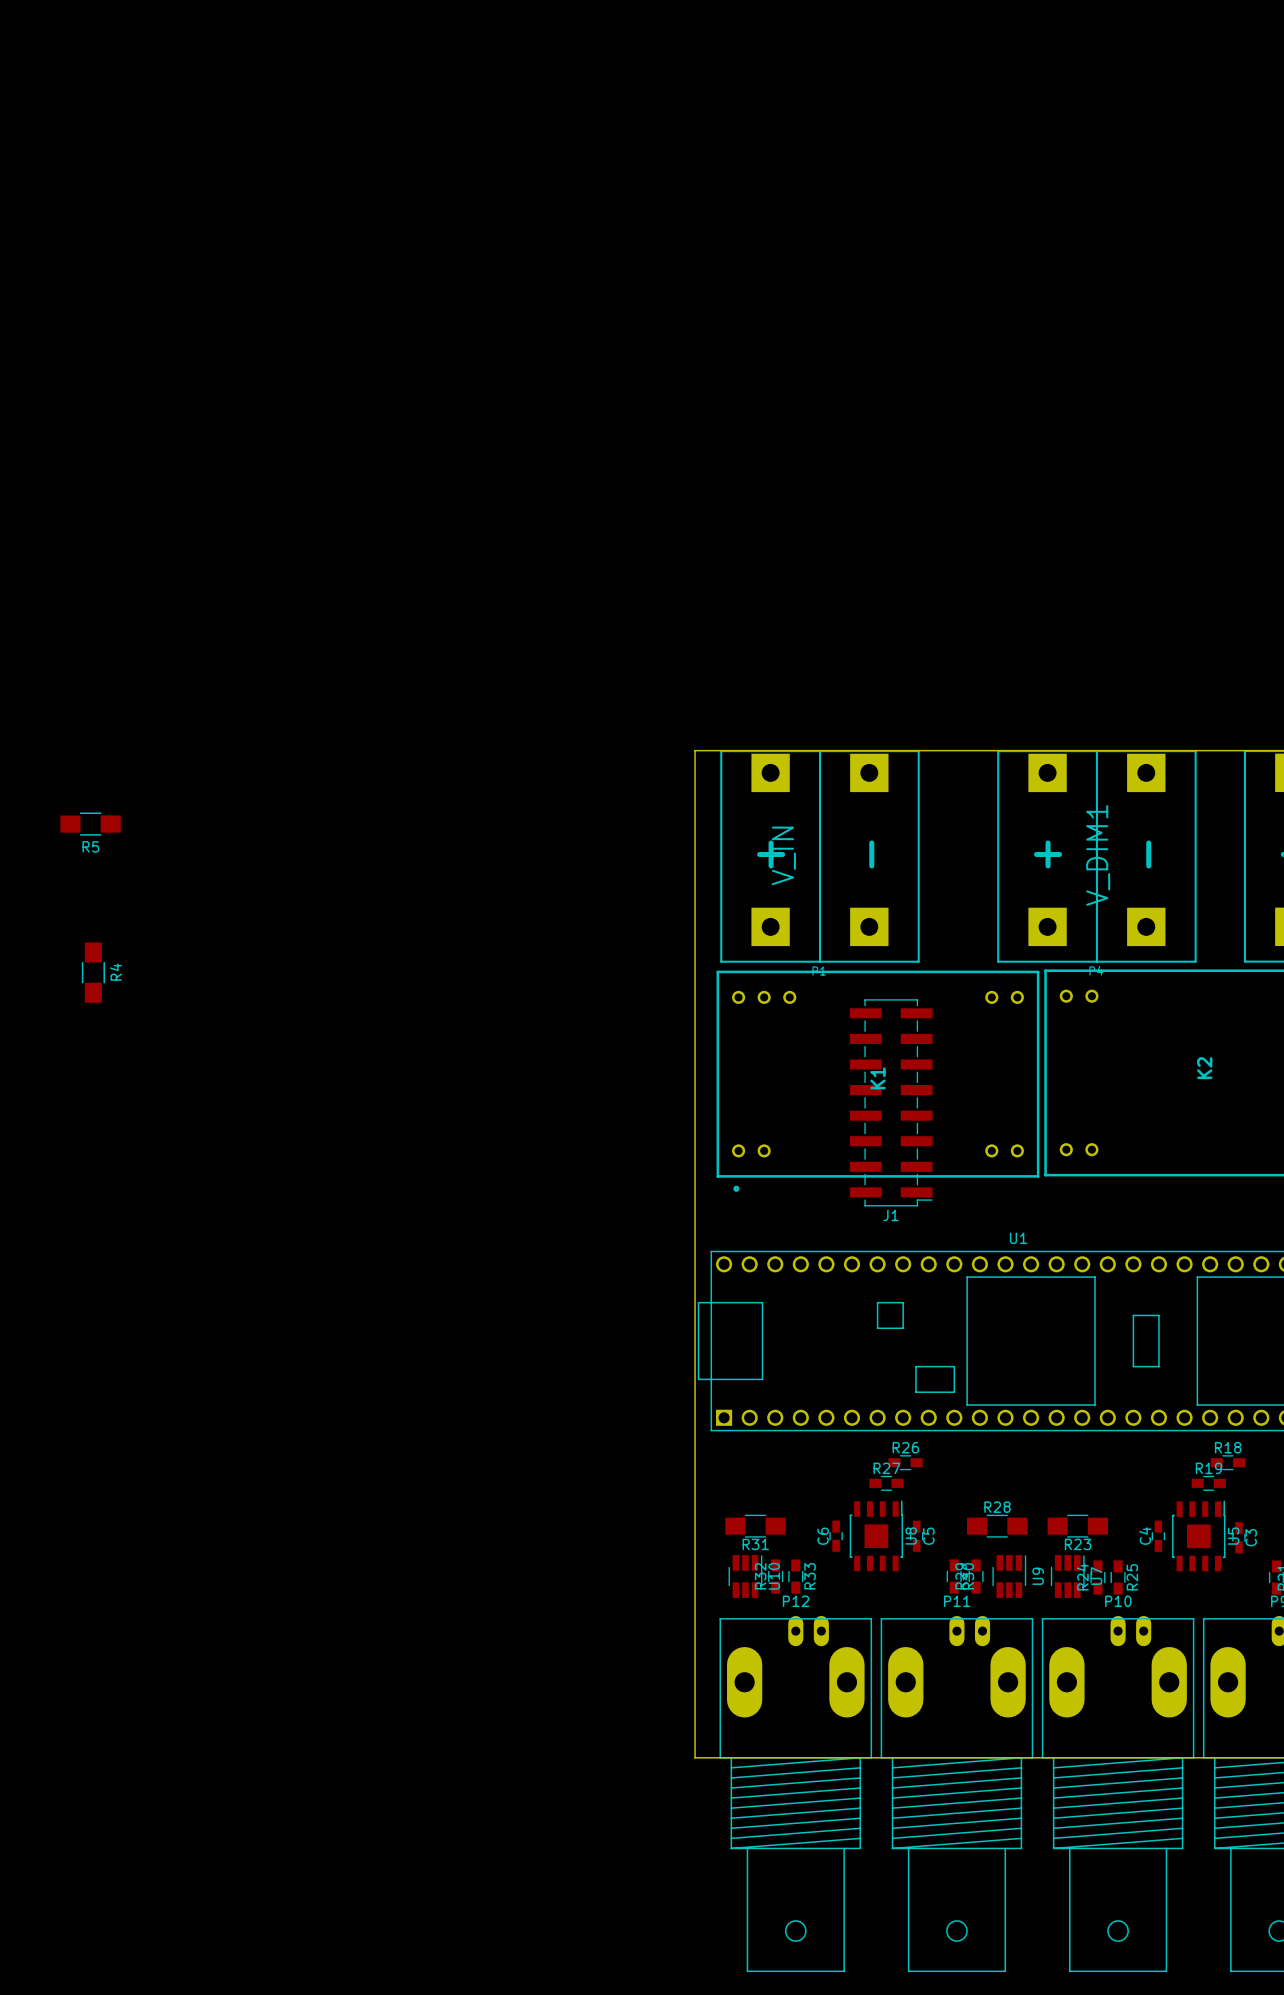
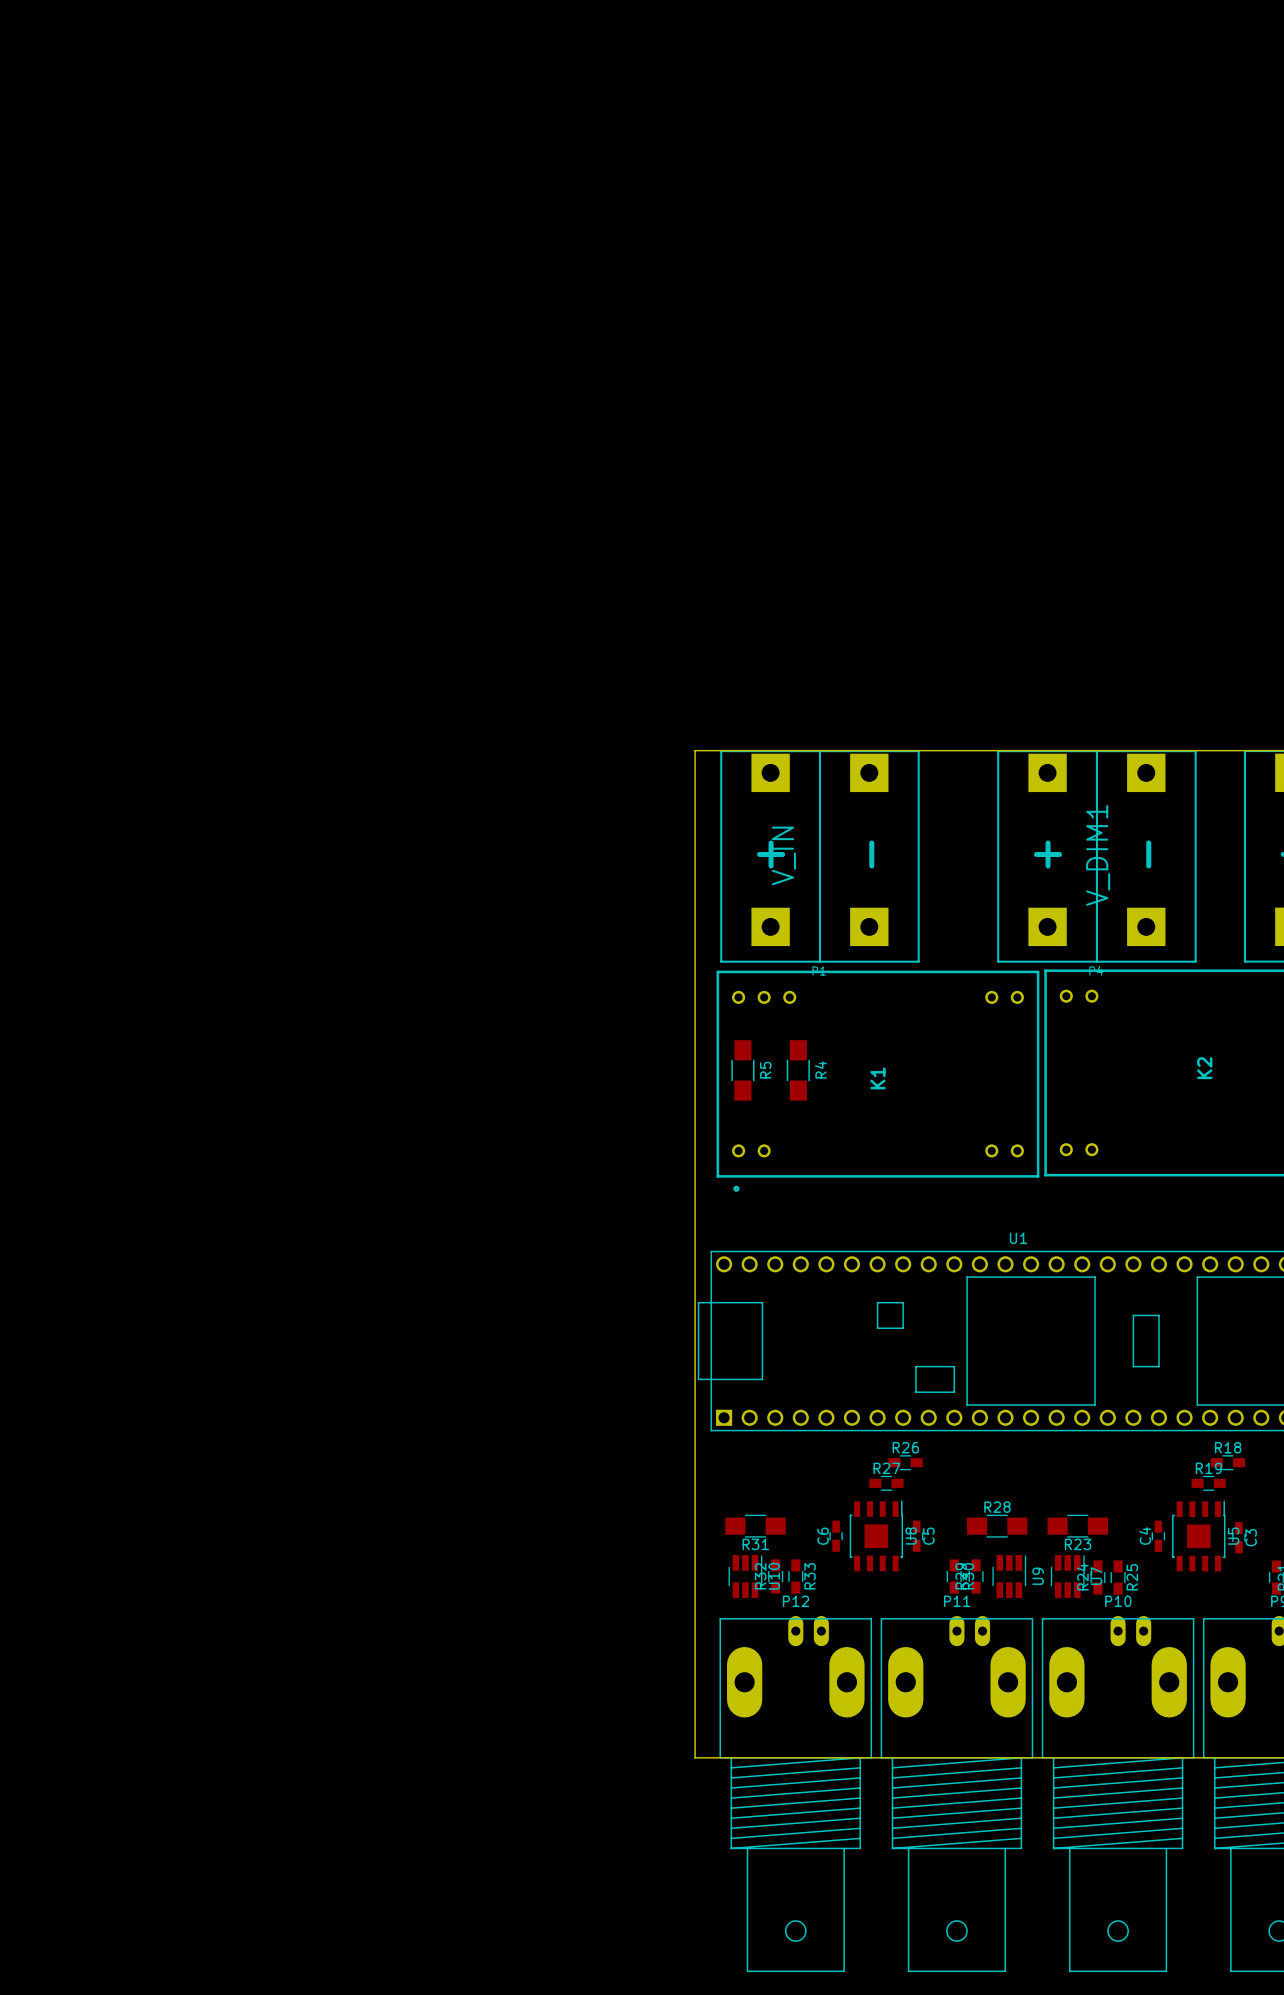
R5 rotation: 0° (90, 824) -> 90° clockwise (742, 1070)
R5 position: (90, 824) -> (742, 1070)
R5 name position: R5 (90, 846) -> R5 (765, 1070)
R4 position: (93, 972) -> (798, 1070)
J1: (891, 1102) -> none

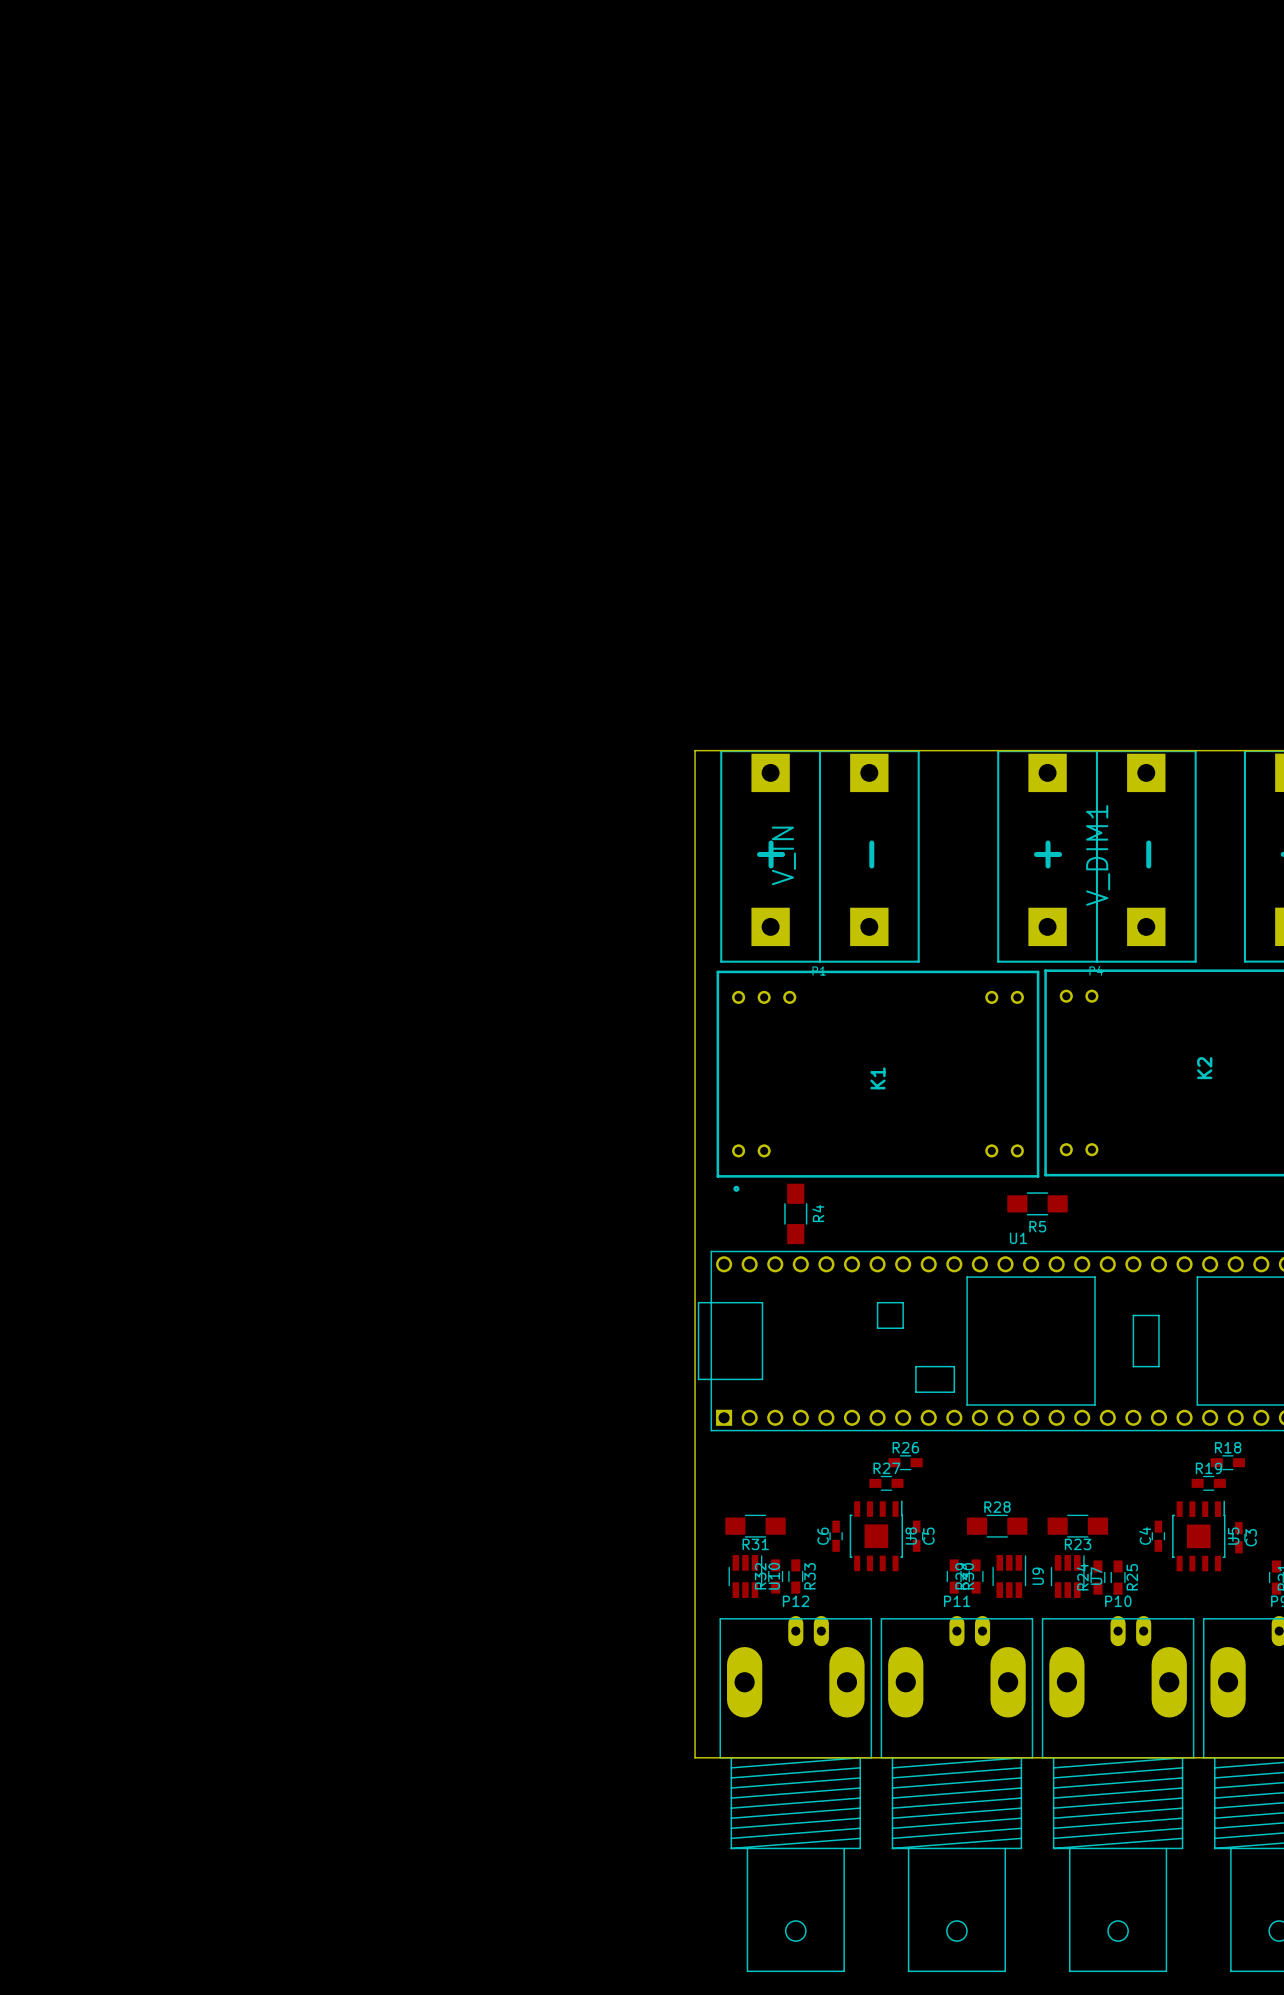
R5 rotation: 0° (742, 1070) -> 90° clockwise (1037, 1203)
R5 position: (742, 1070) -> (1037, 1203)
R4 position: (798, 1070) -> (795, 1213)

